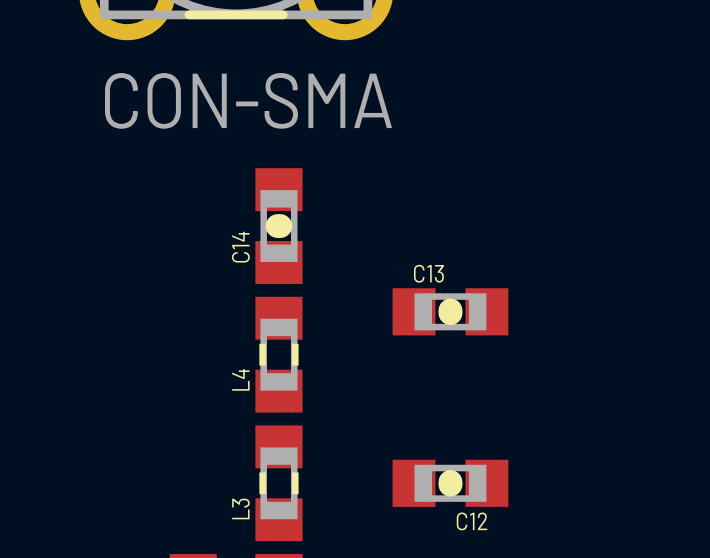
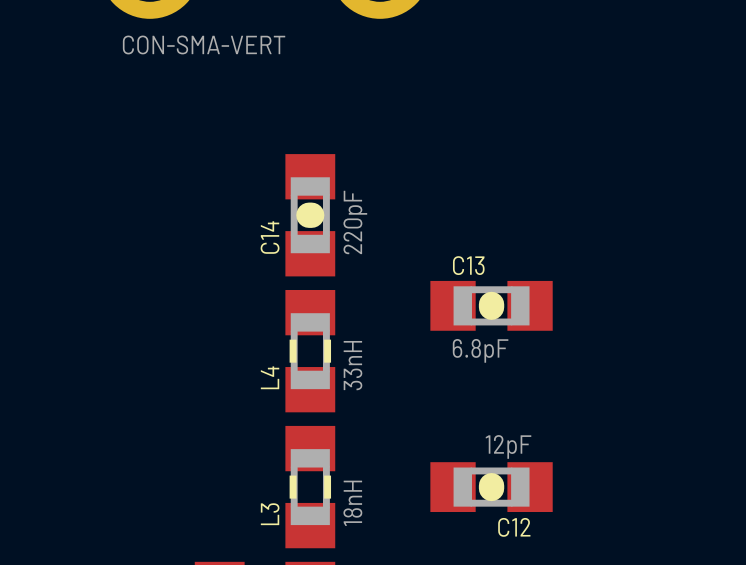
part value: CON-SMA (248, 100) -> CON-SMA-VERT (204, 44)
C14 value: none -> 220pF (355, 222)
C13 value: none -> 6.8pF (480, 350)
L4 value: none -> 33nH (353, 365)
C12 value: none -> 12pF (508, 446)
L3 value: none -> 18nH (352, 503)

